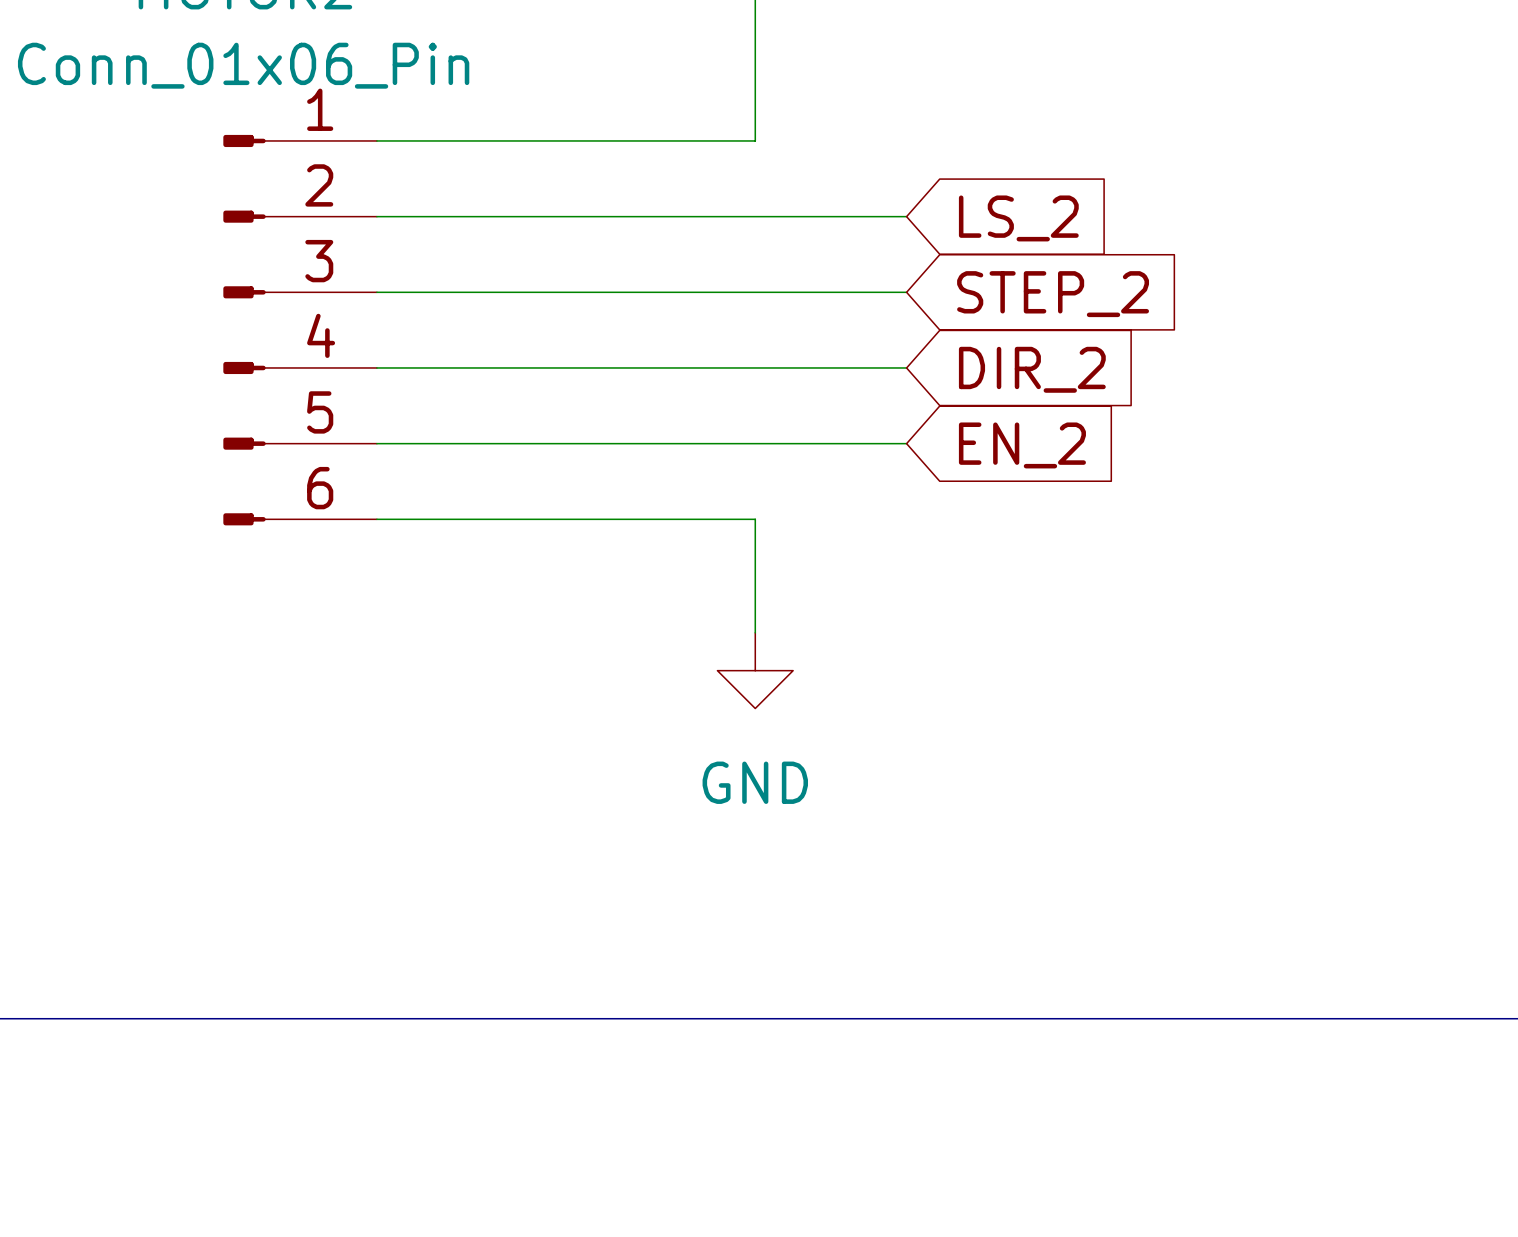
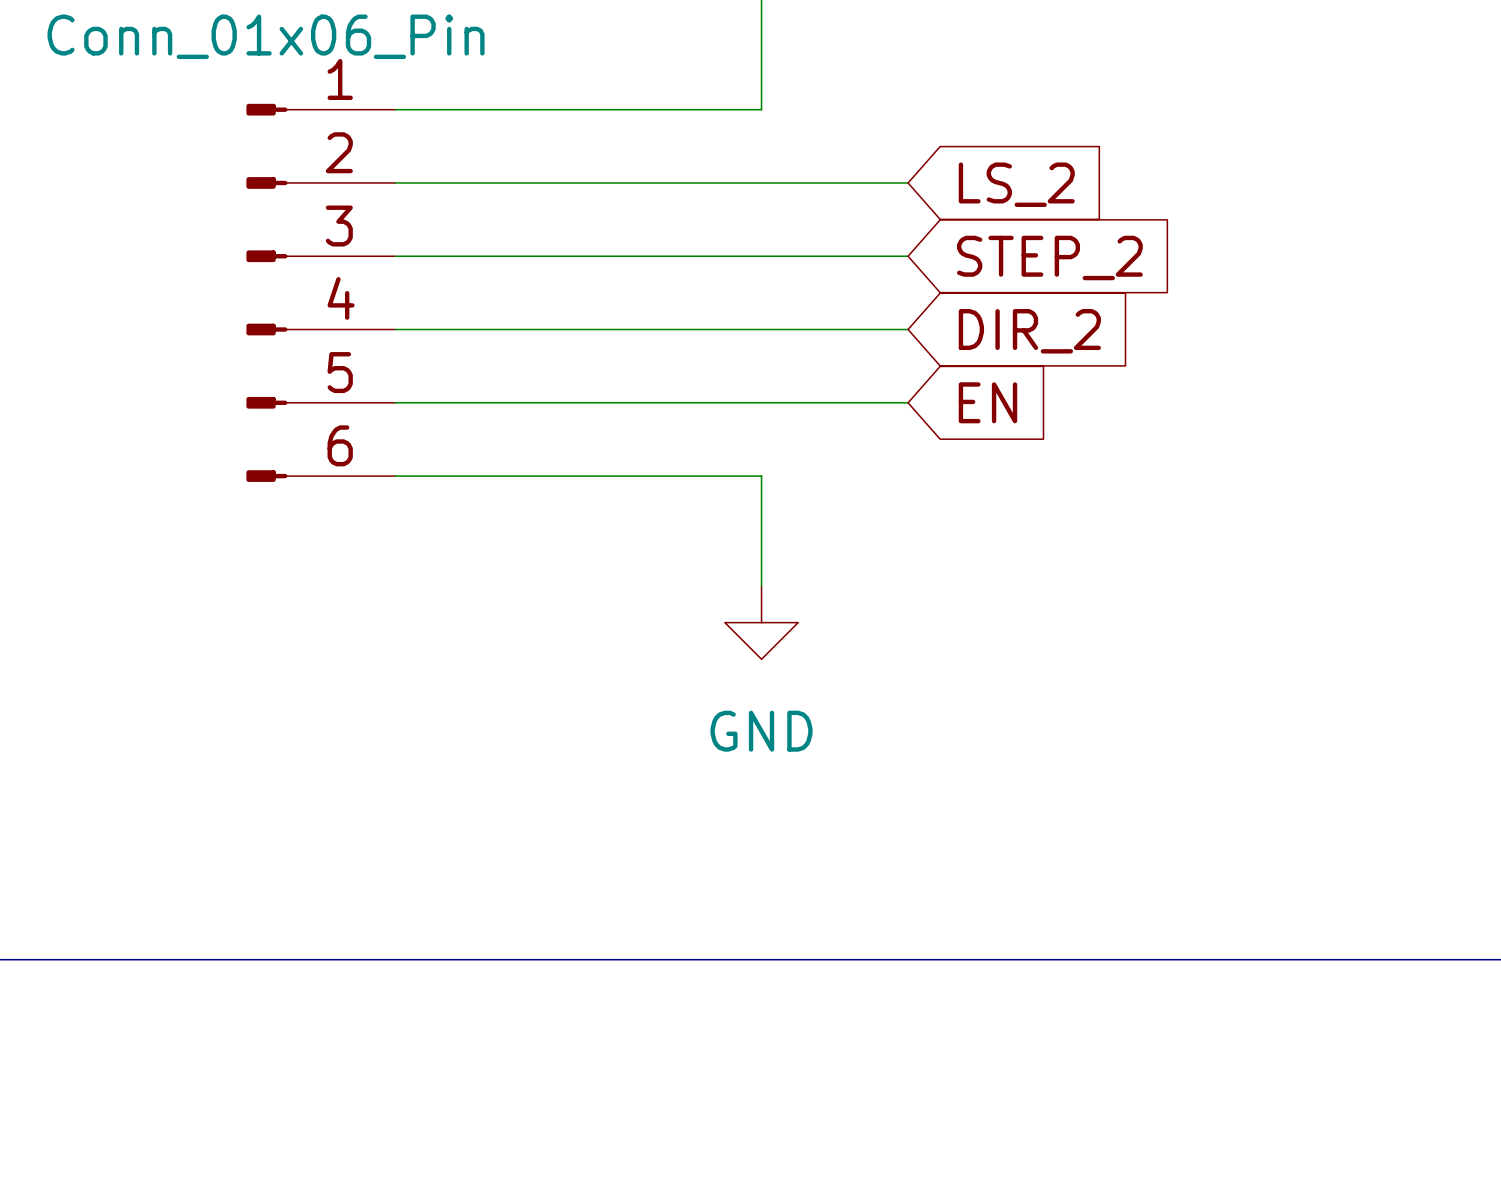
global label: EN_2 (1022, 445) -> EN (987, 402)

